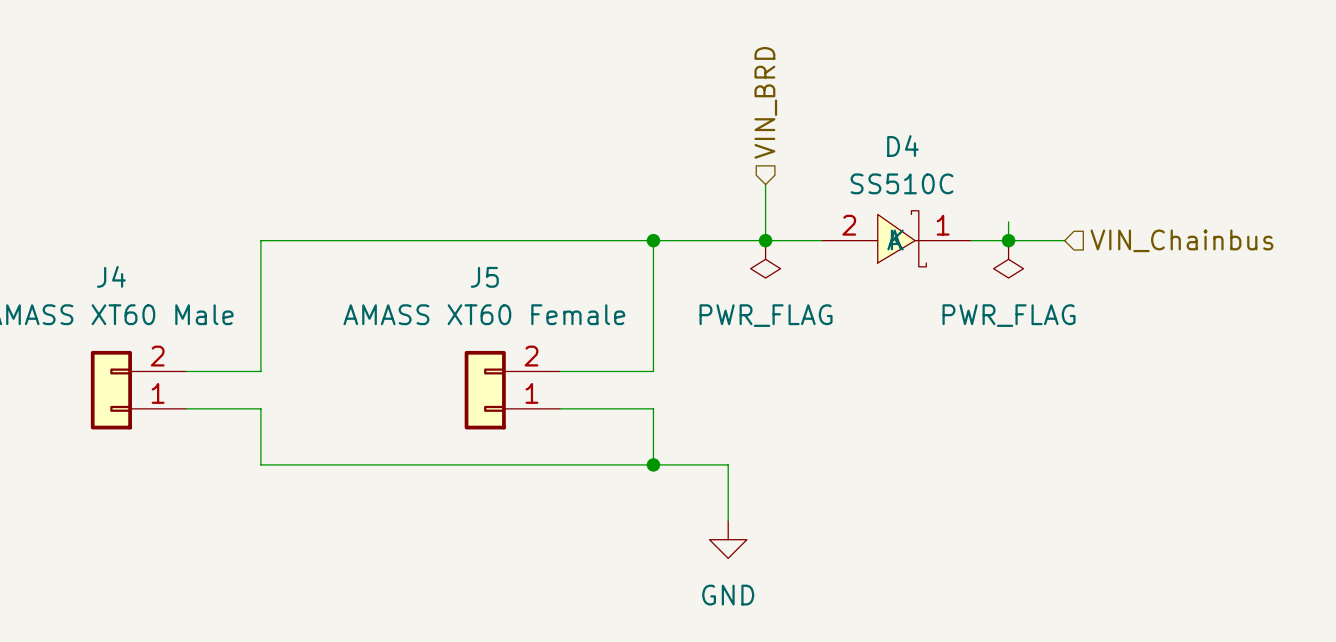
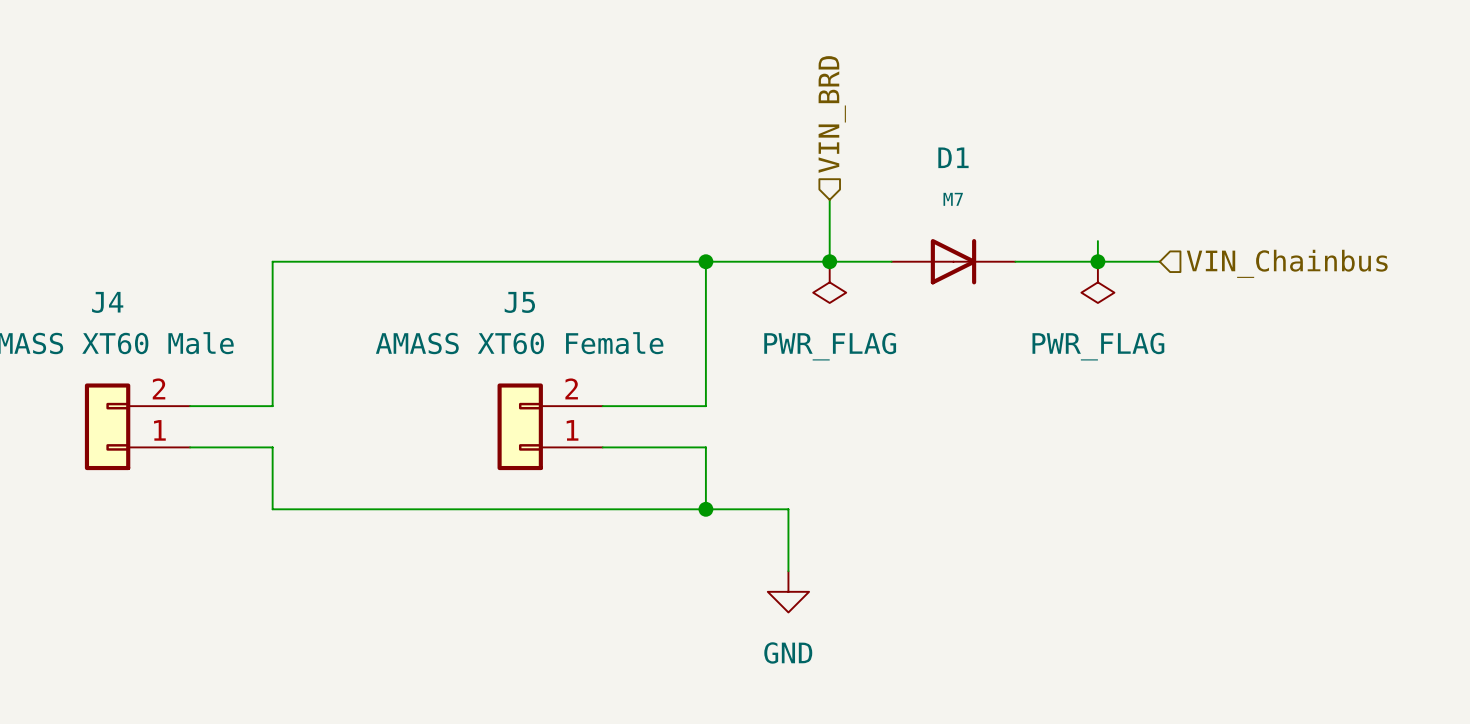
D4: SS510C (896, 238) -> none
D1: none -> M7 (953, 261)

